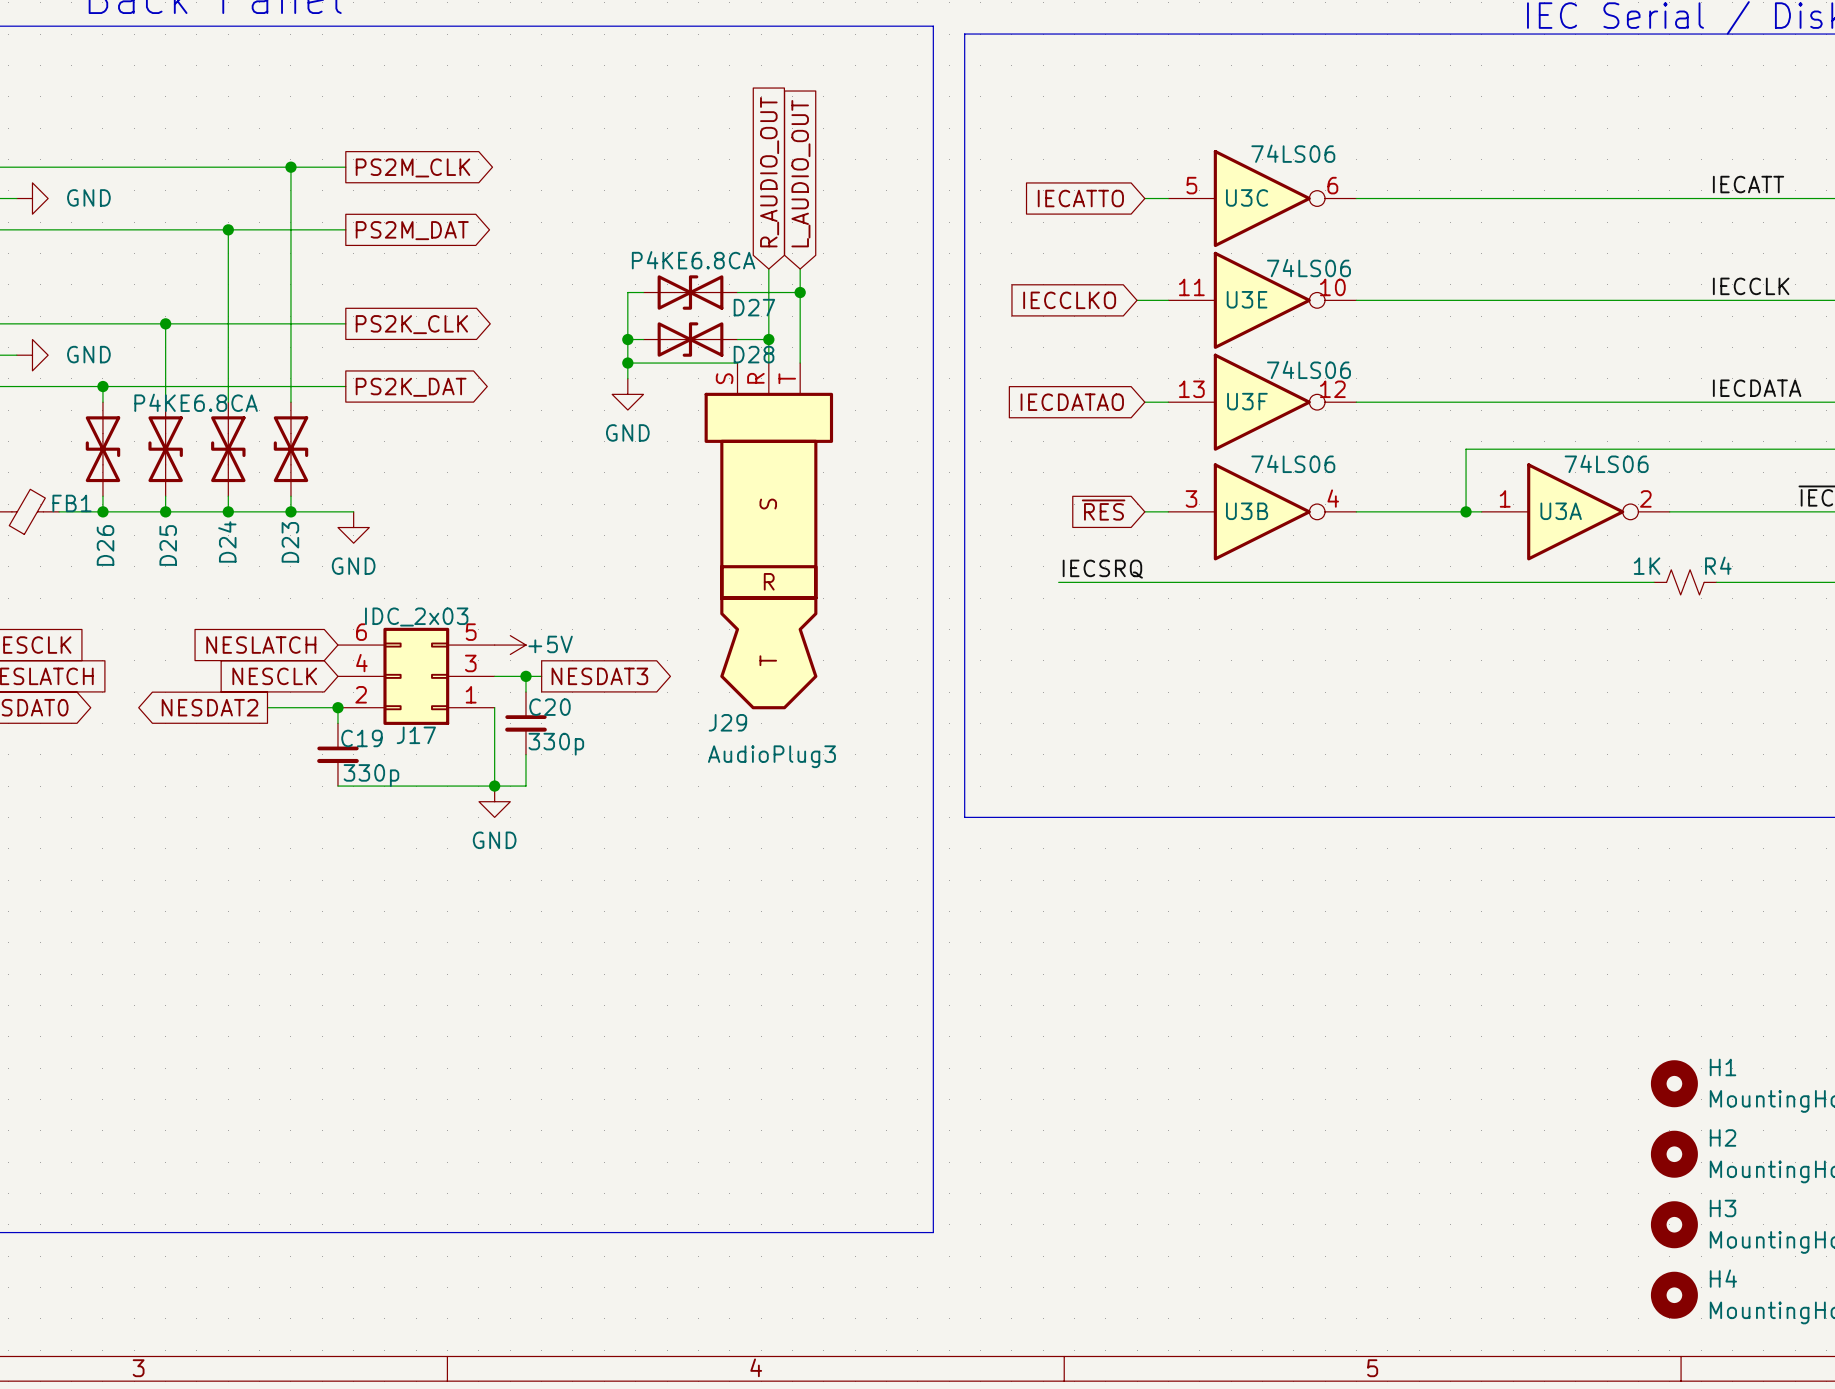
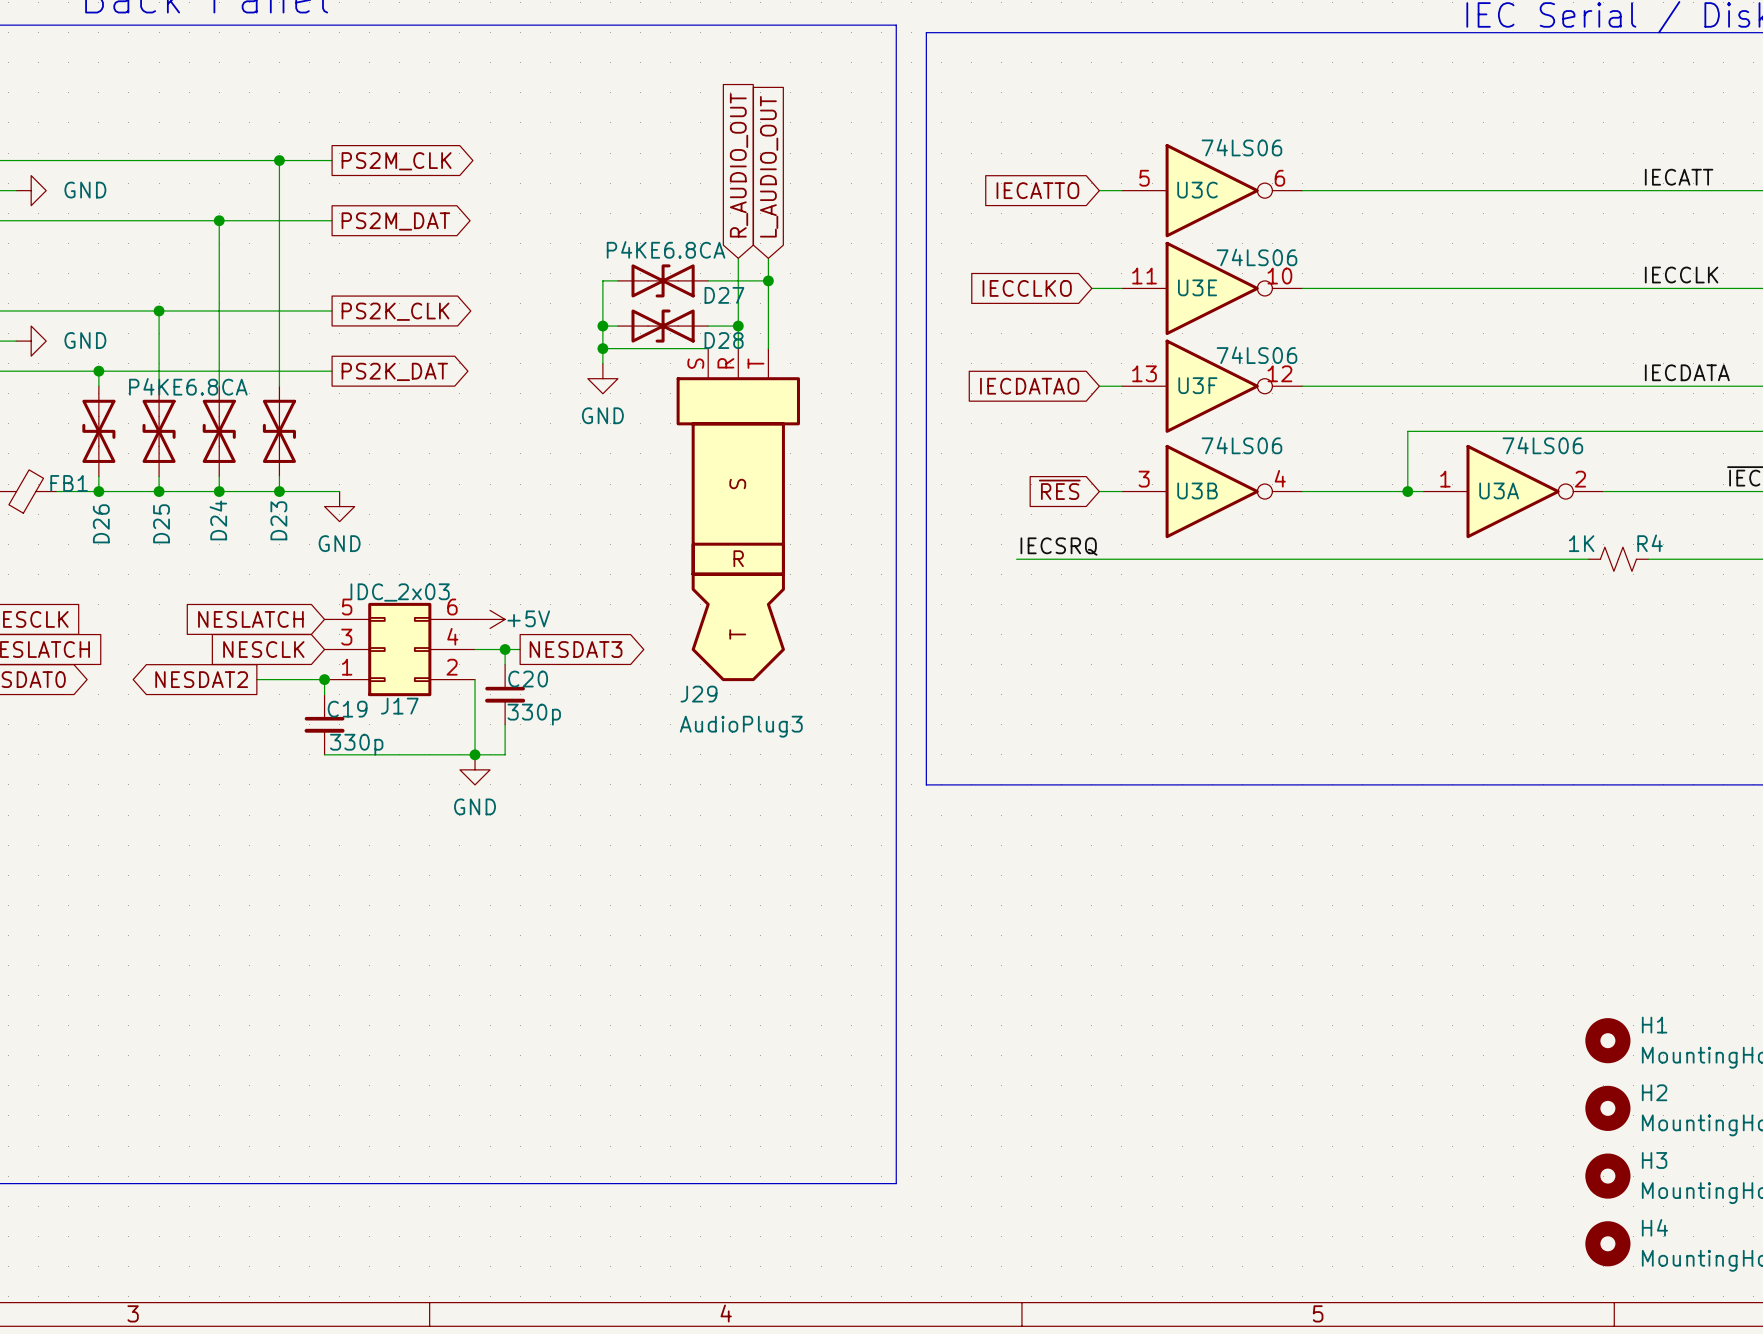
J17 flip: as is (416, 676) -> left-right (399, 649)

